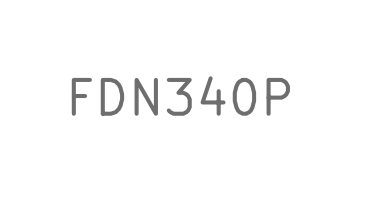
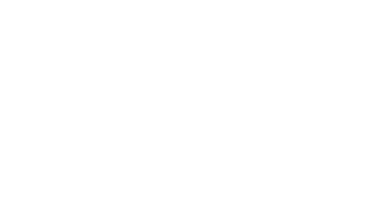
label: FDN340P (180, 96) -> none

